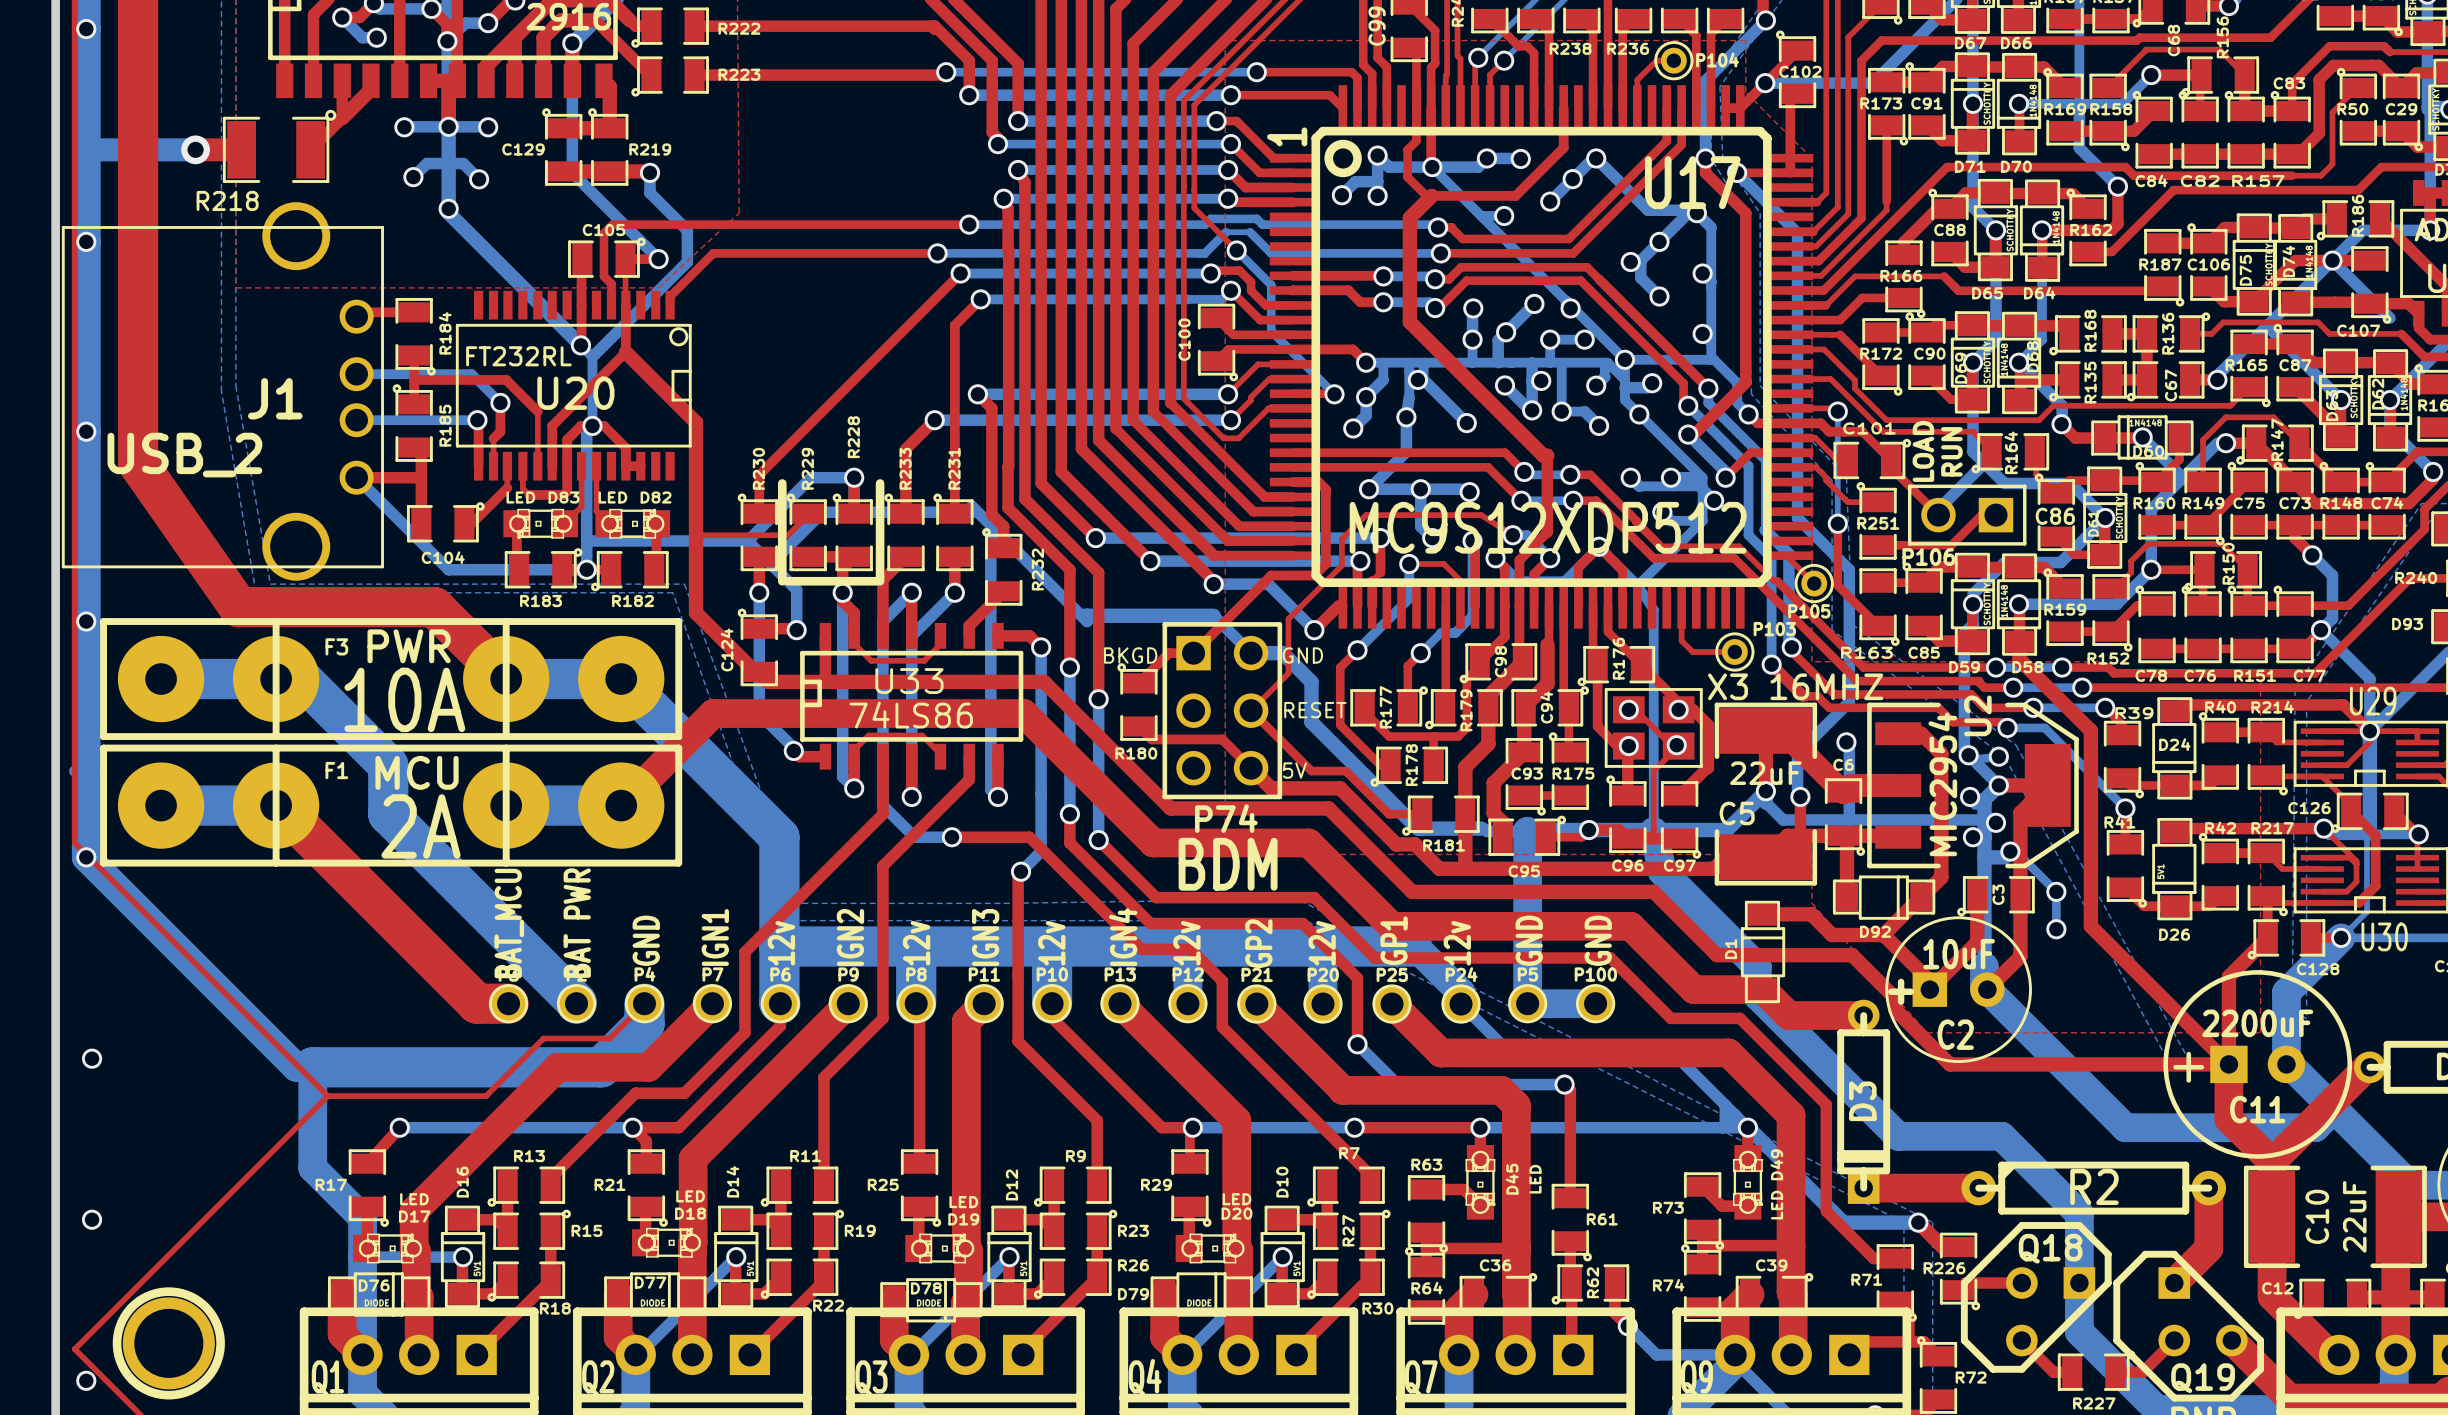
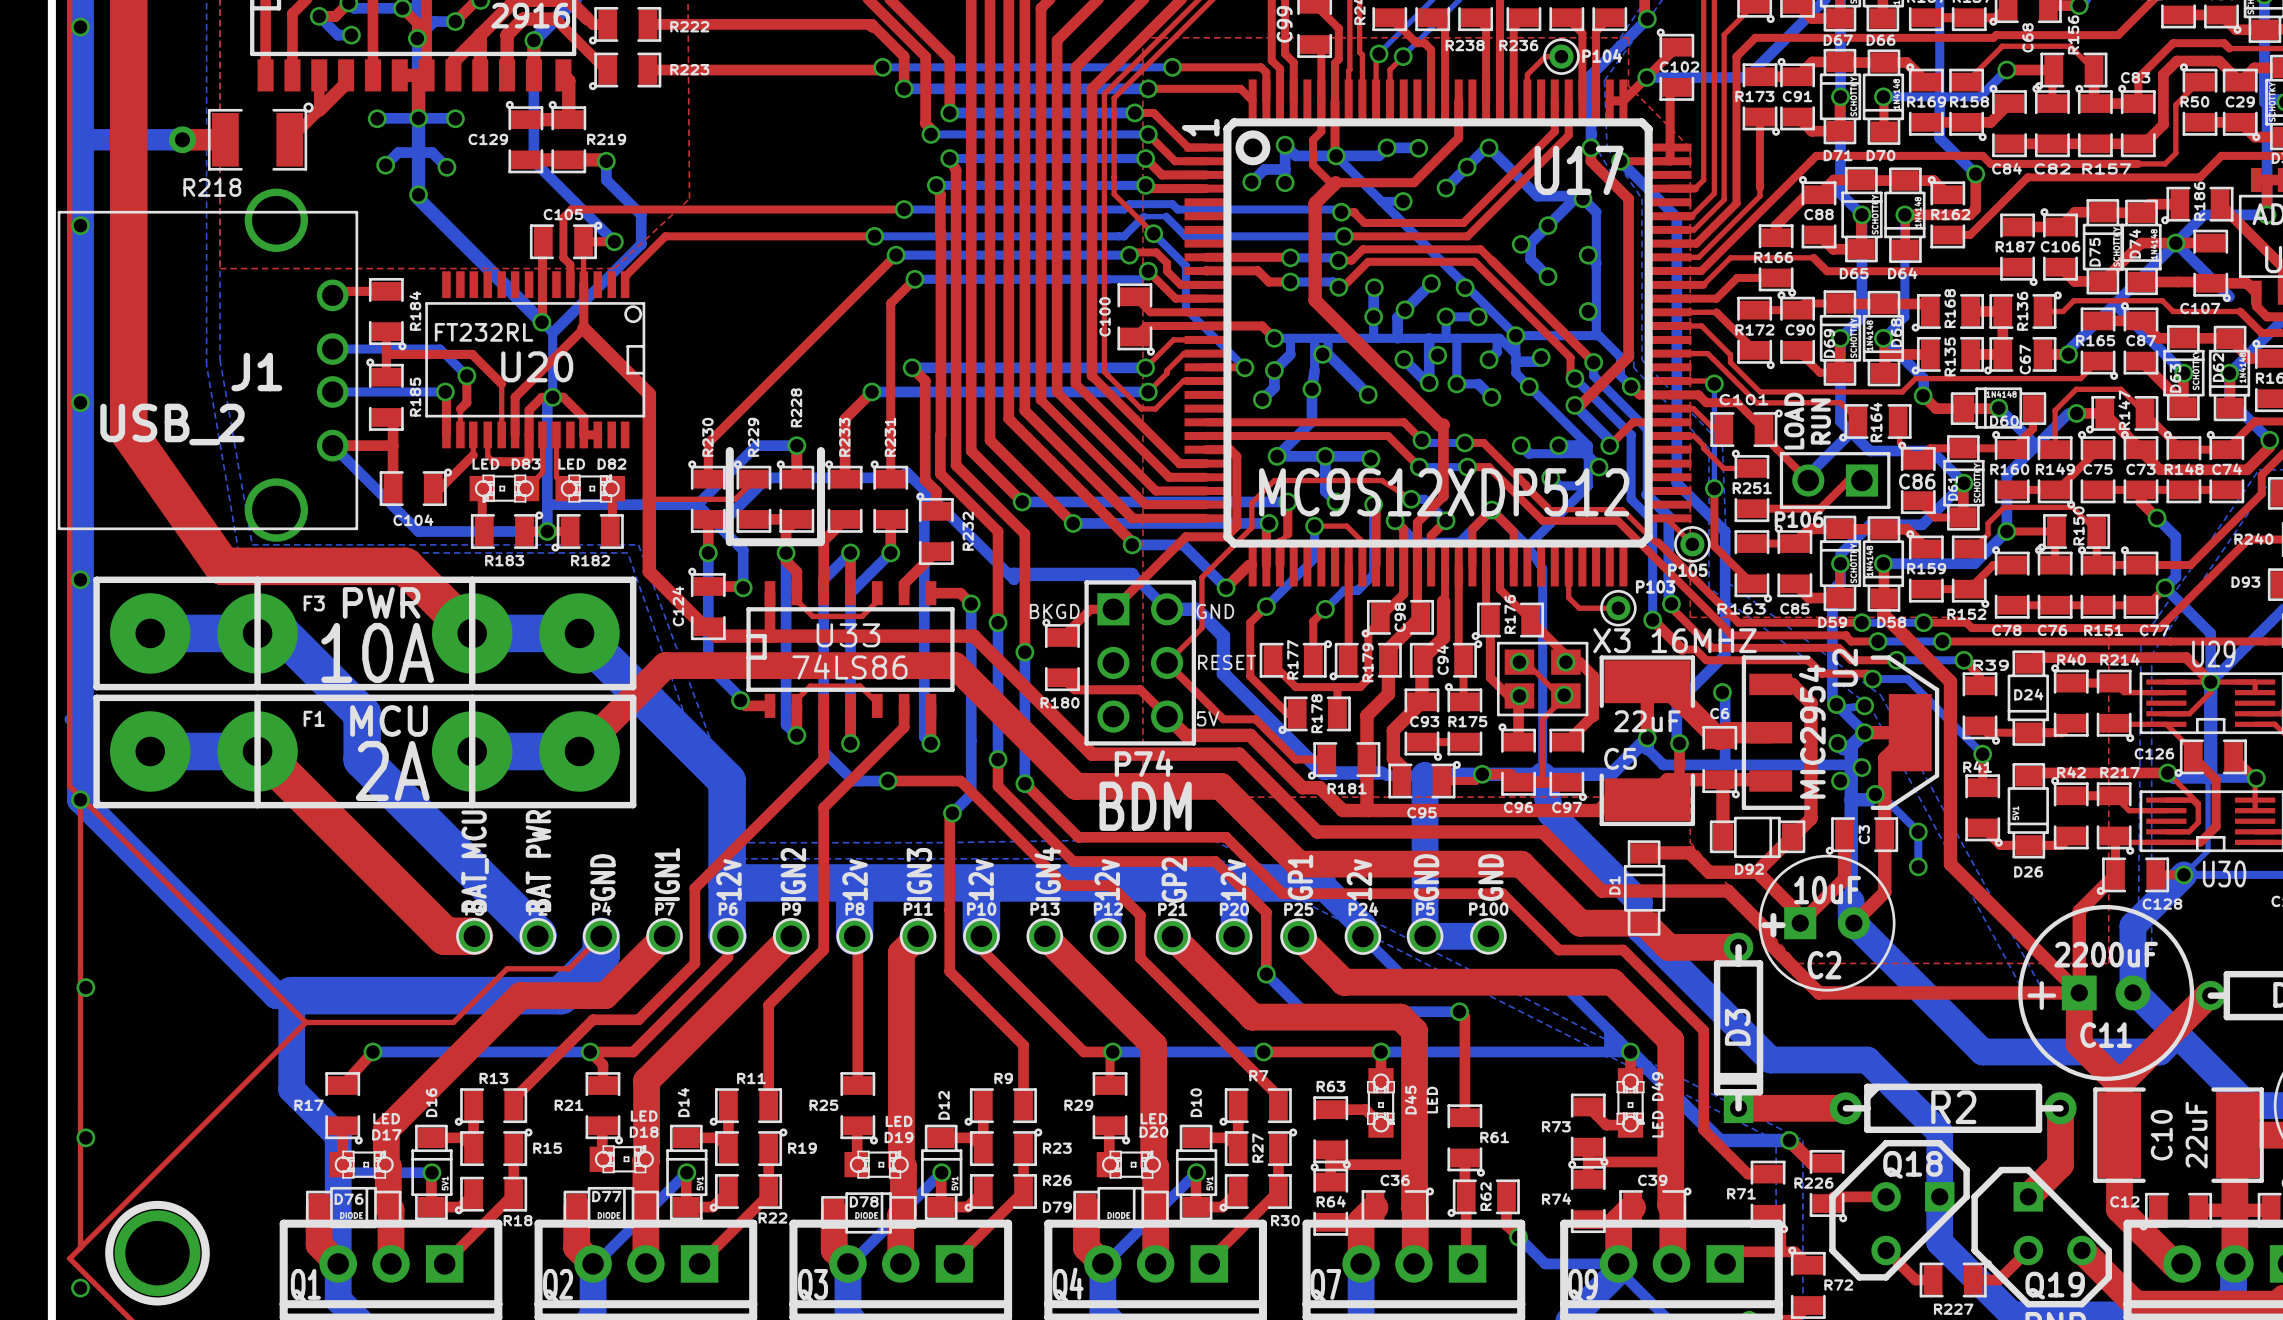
top track: none -> (80, 799) (80, 1247)

